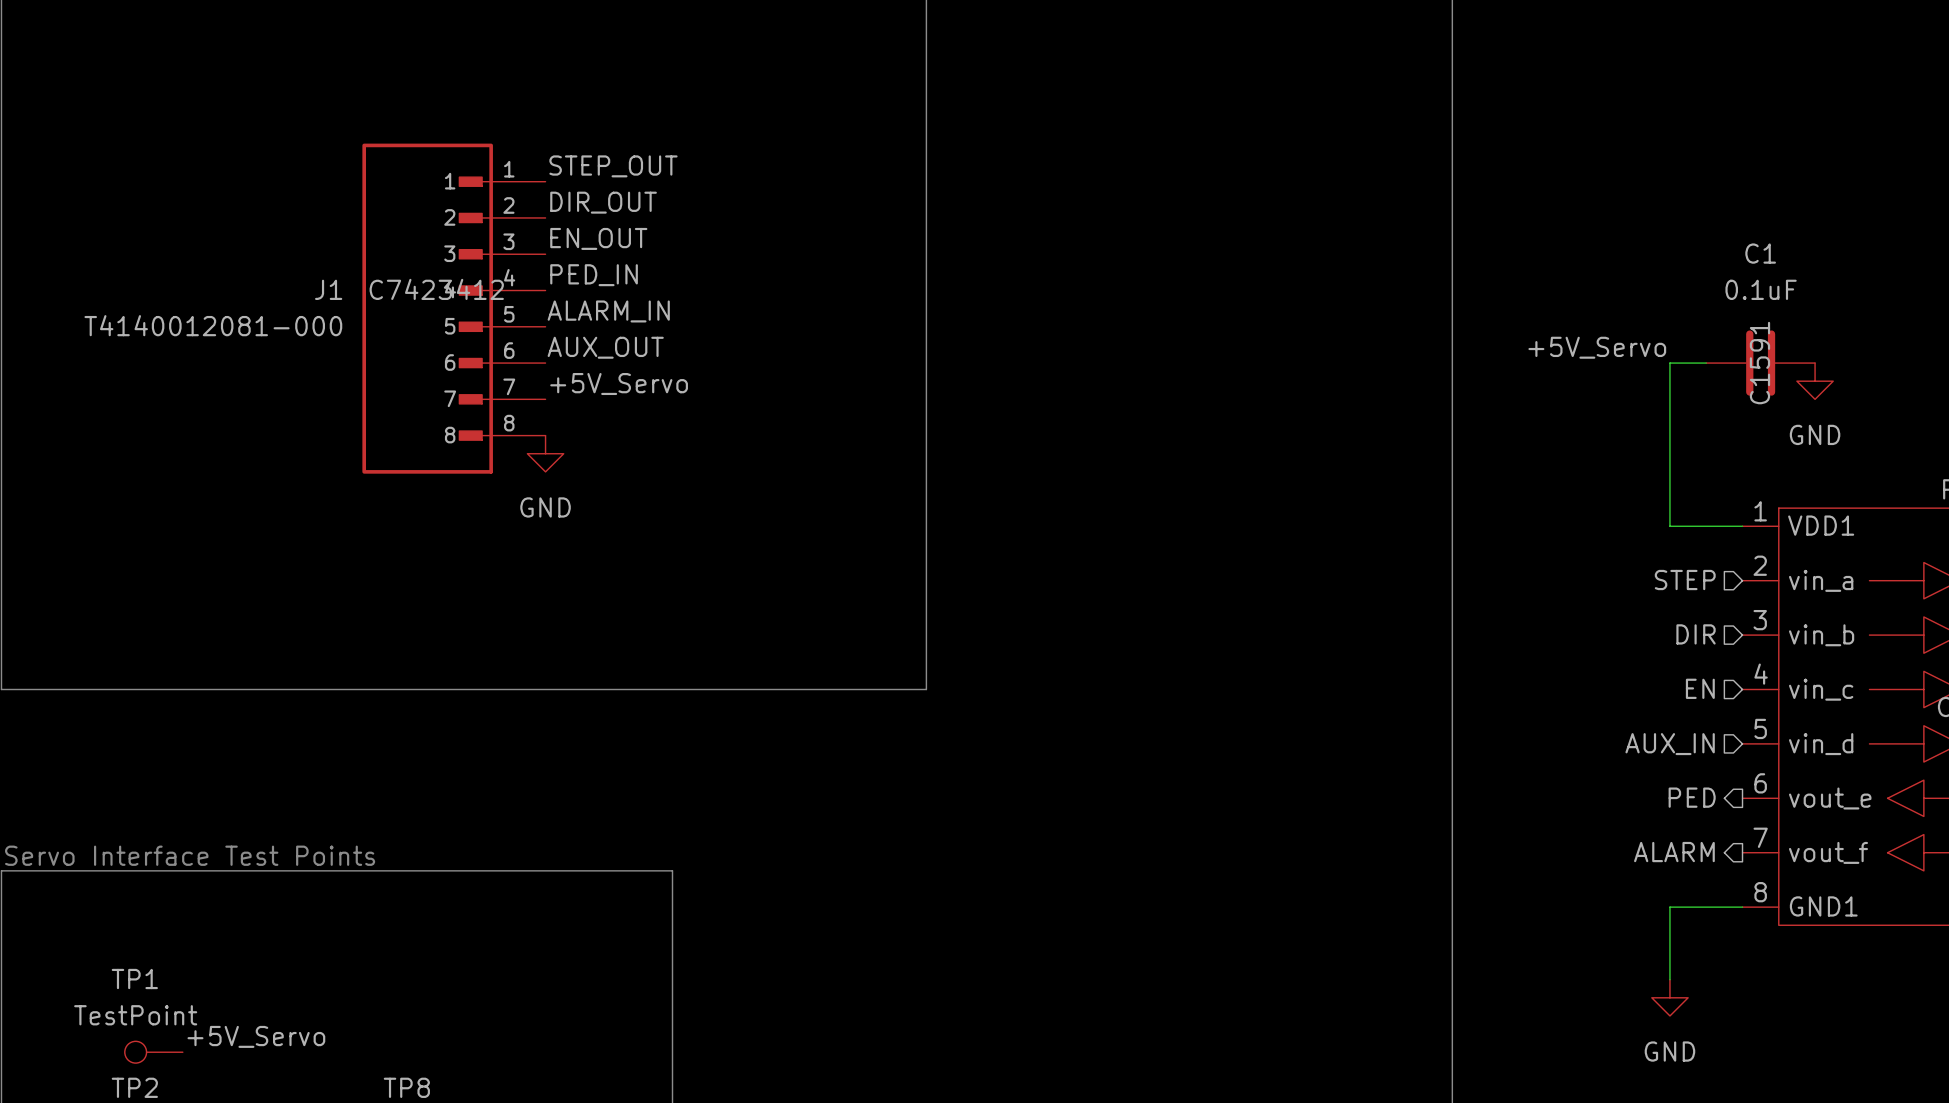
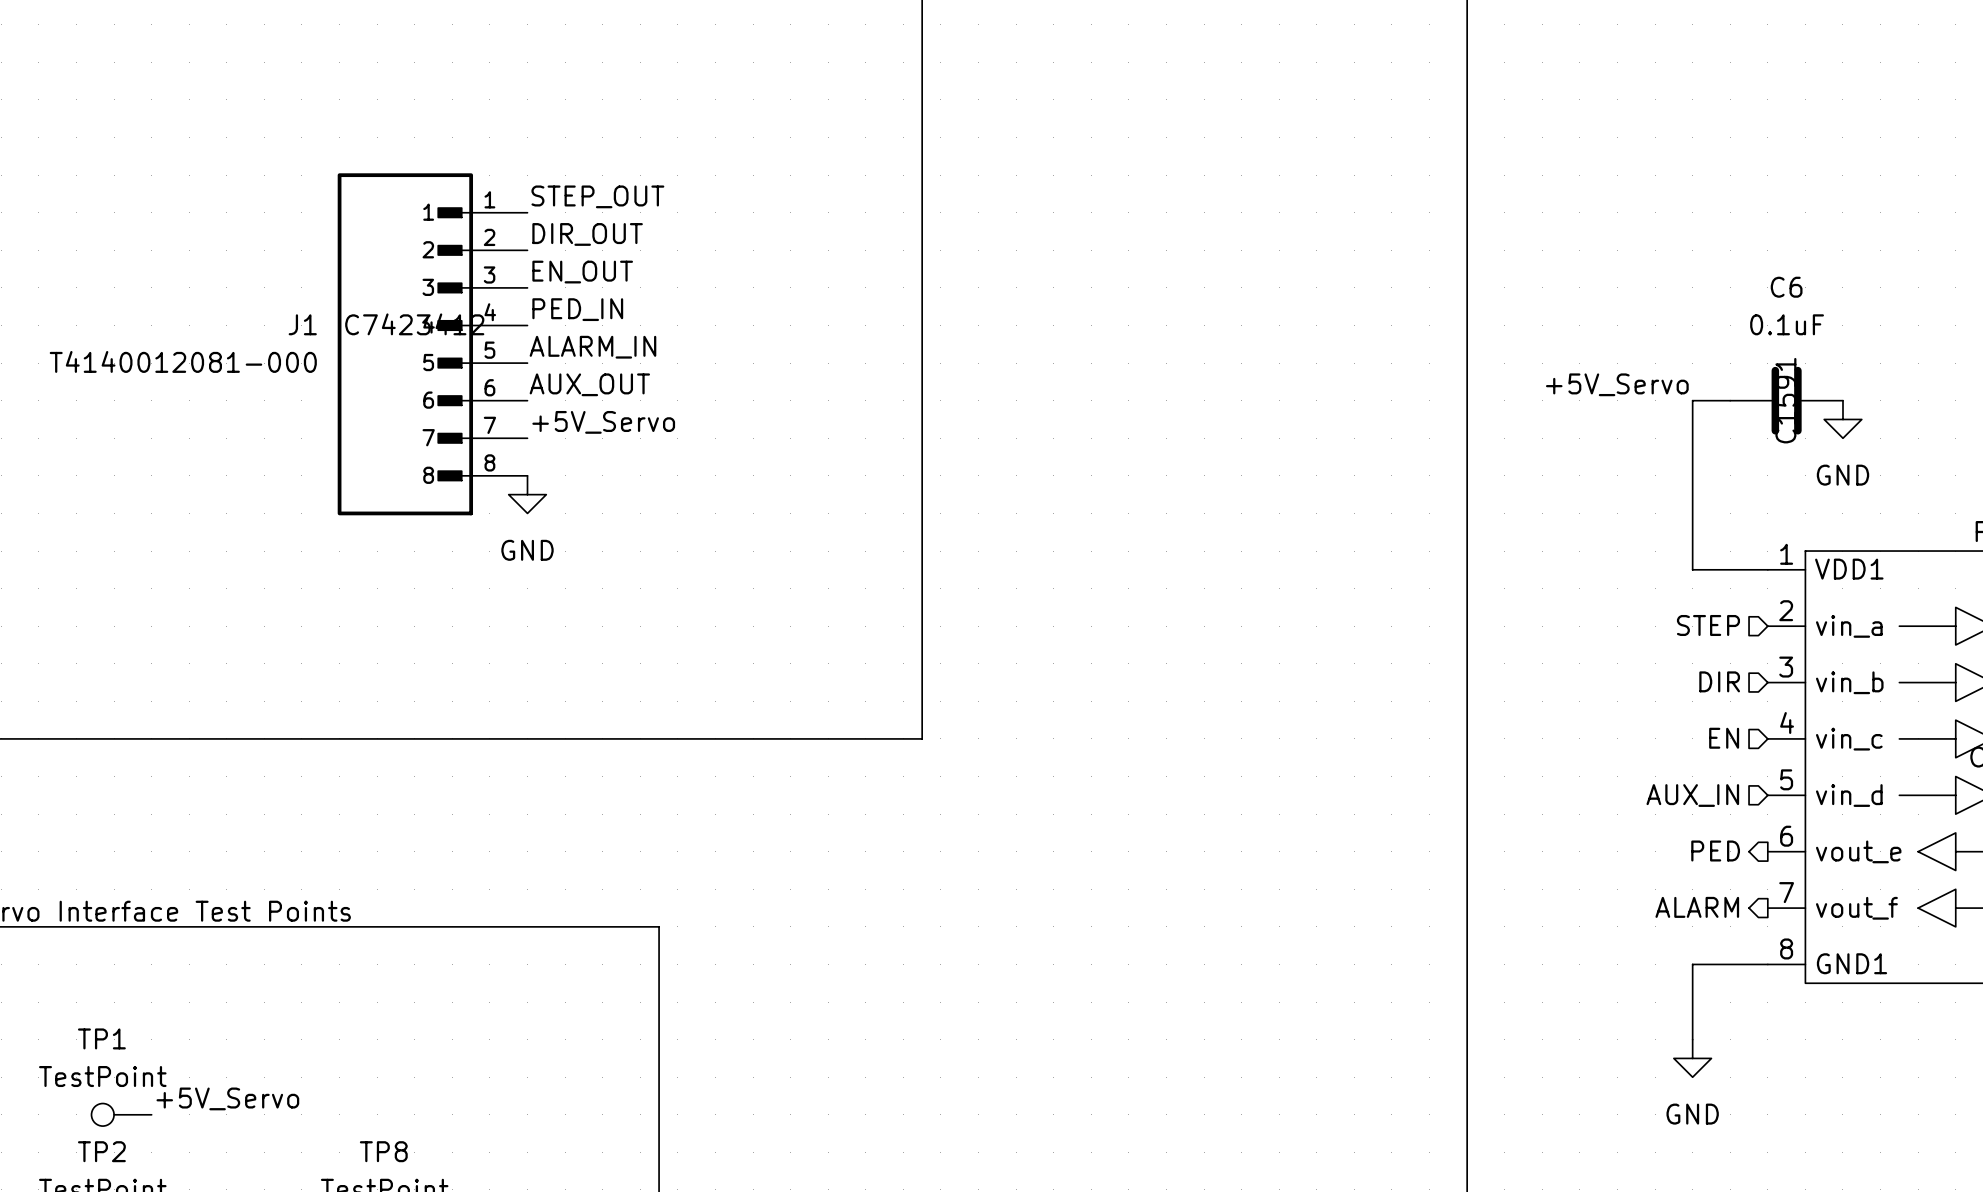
C1 name: C1 (1760, 253) -> C6 (1786, 287)

